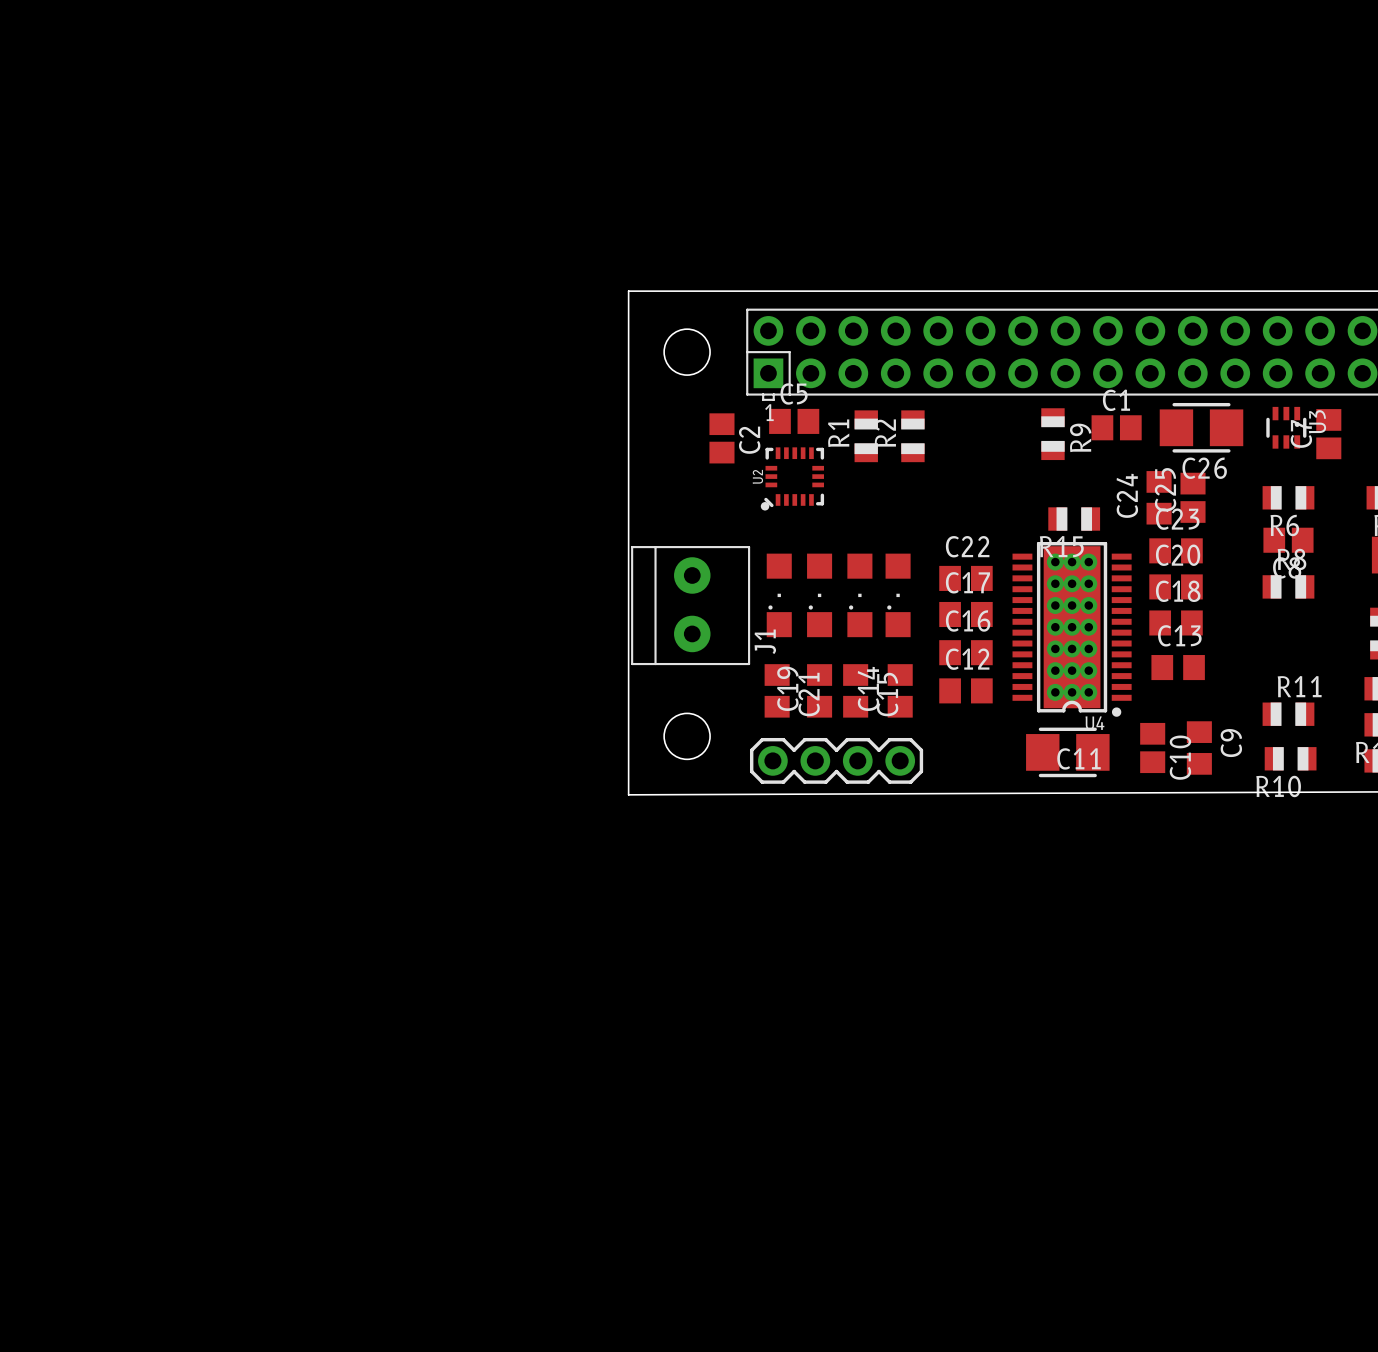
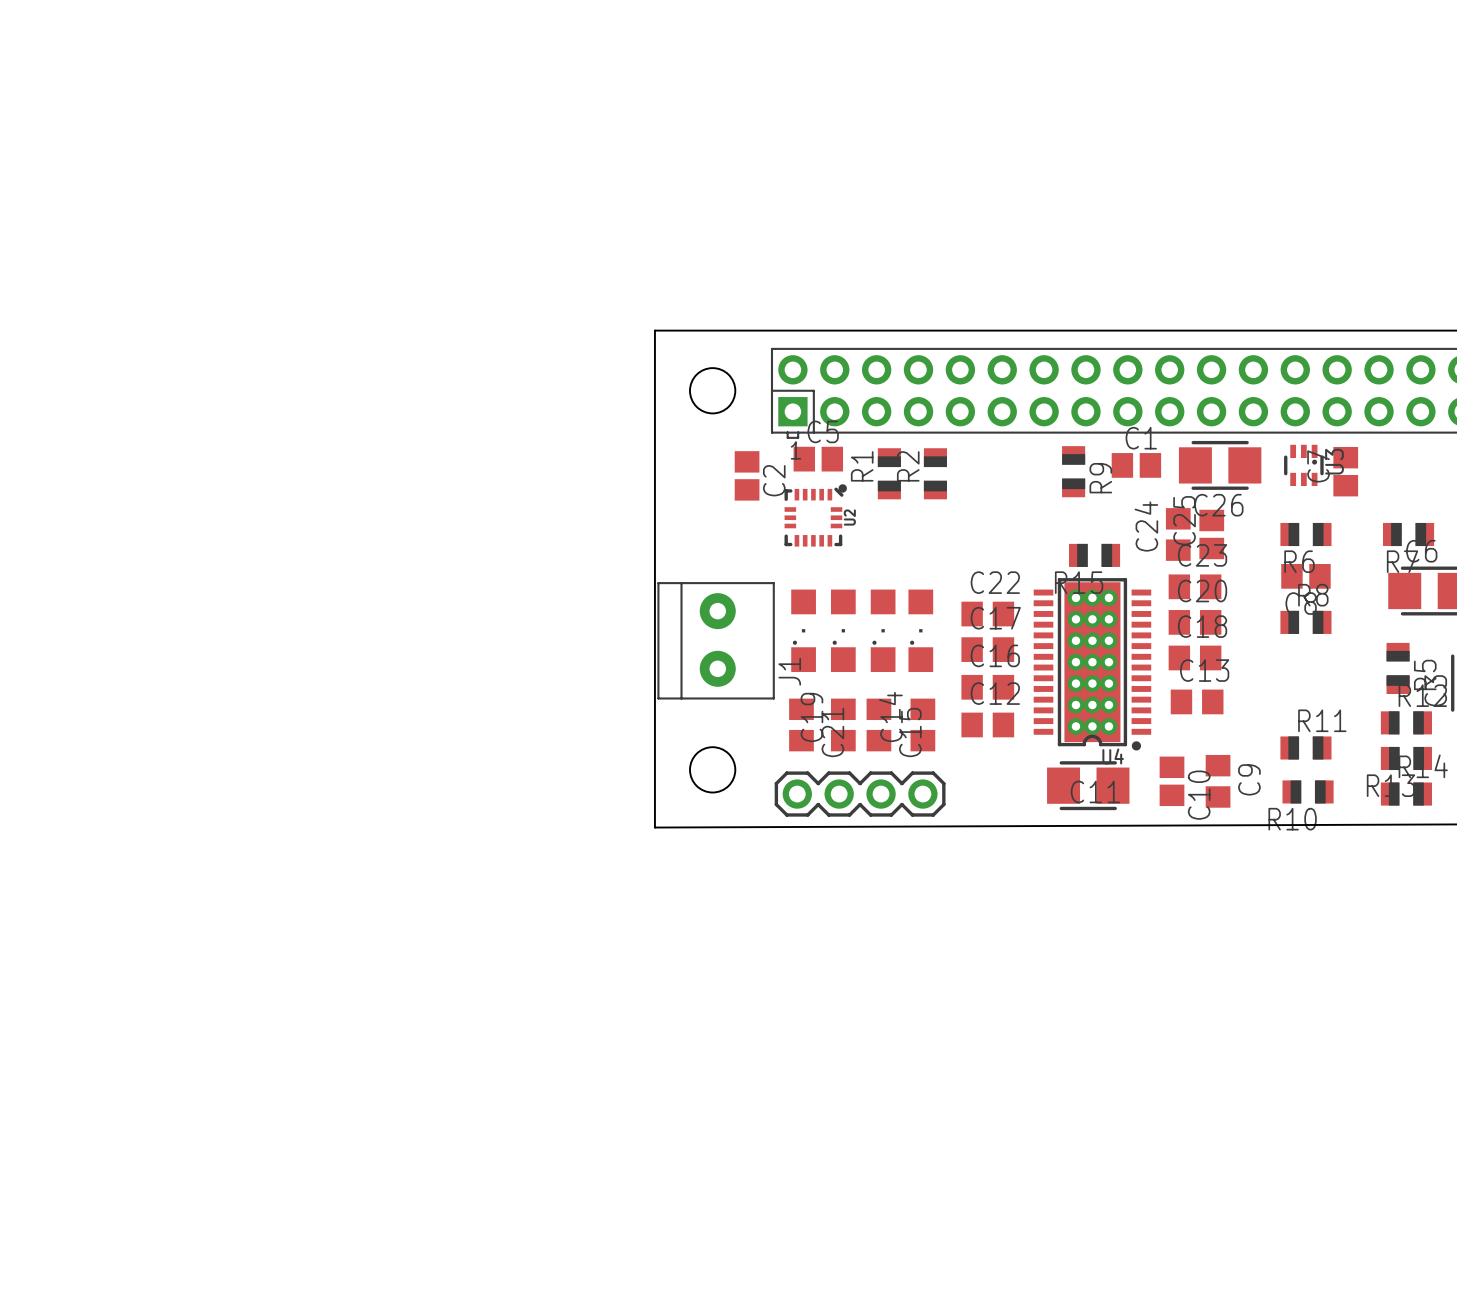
U2 rotation: 0° (792, 478) -> 180° (815, 515)

